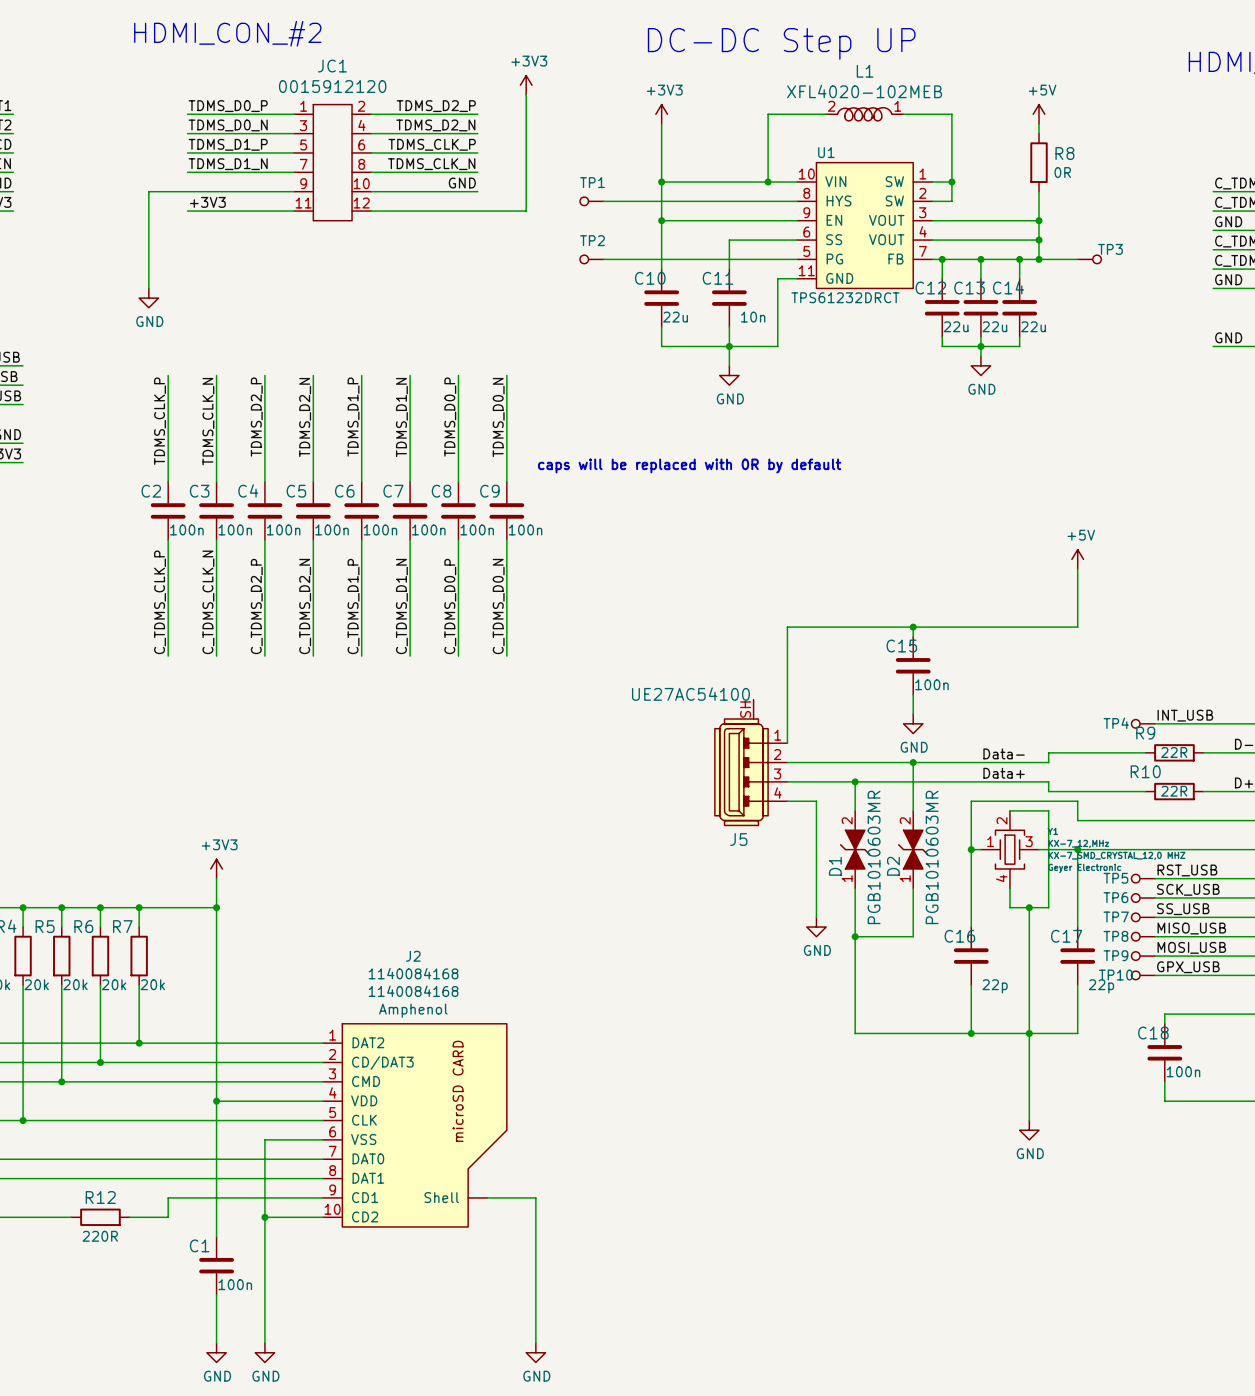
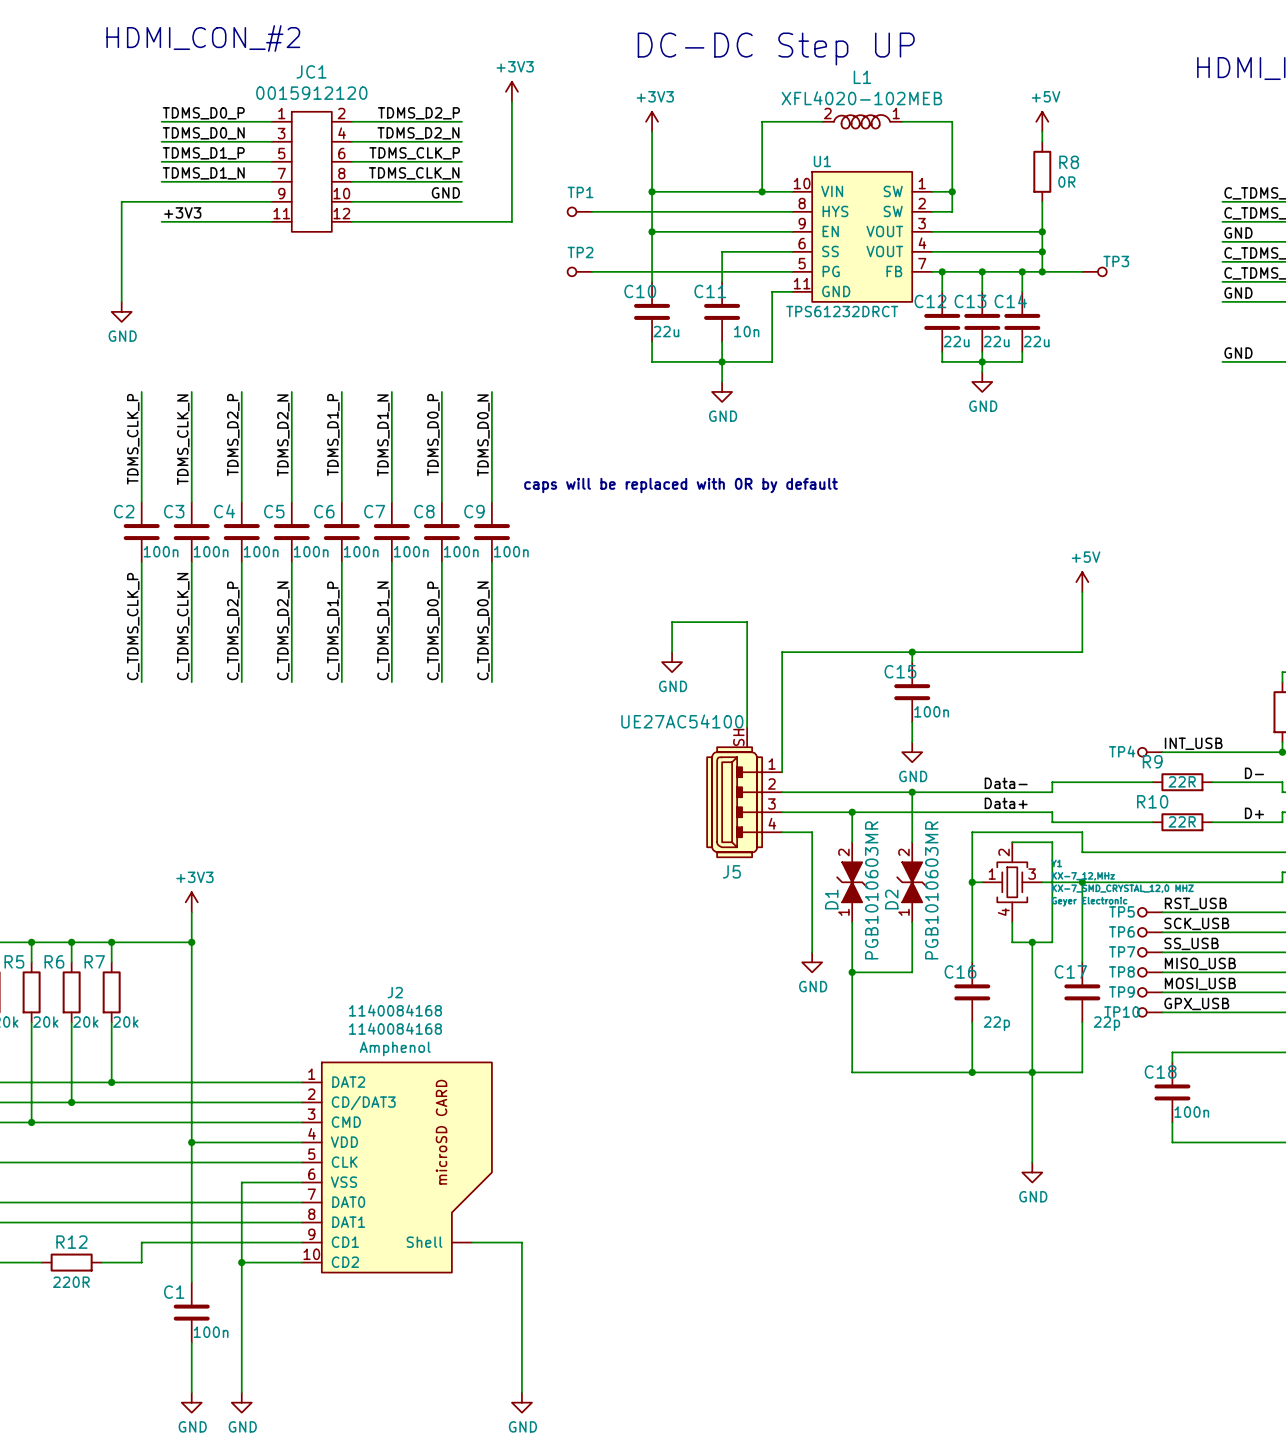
wire: none -> (672, 652) (672, 622) (747, 622) (747, 727)
power symbol: none -> GND (672, 662)

